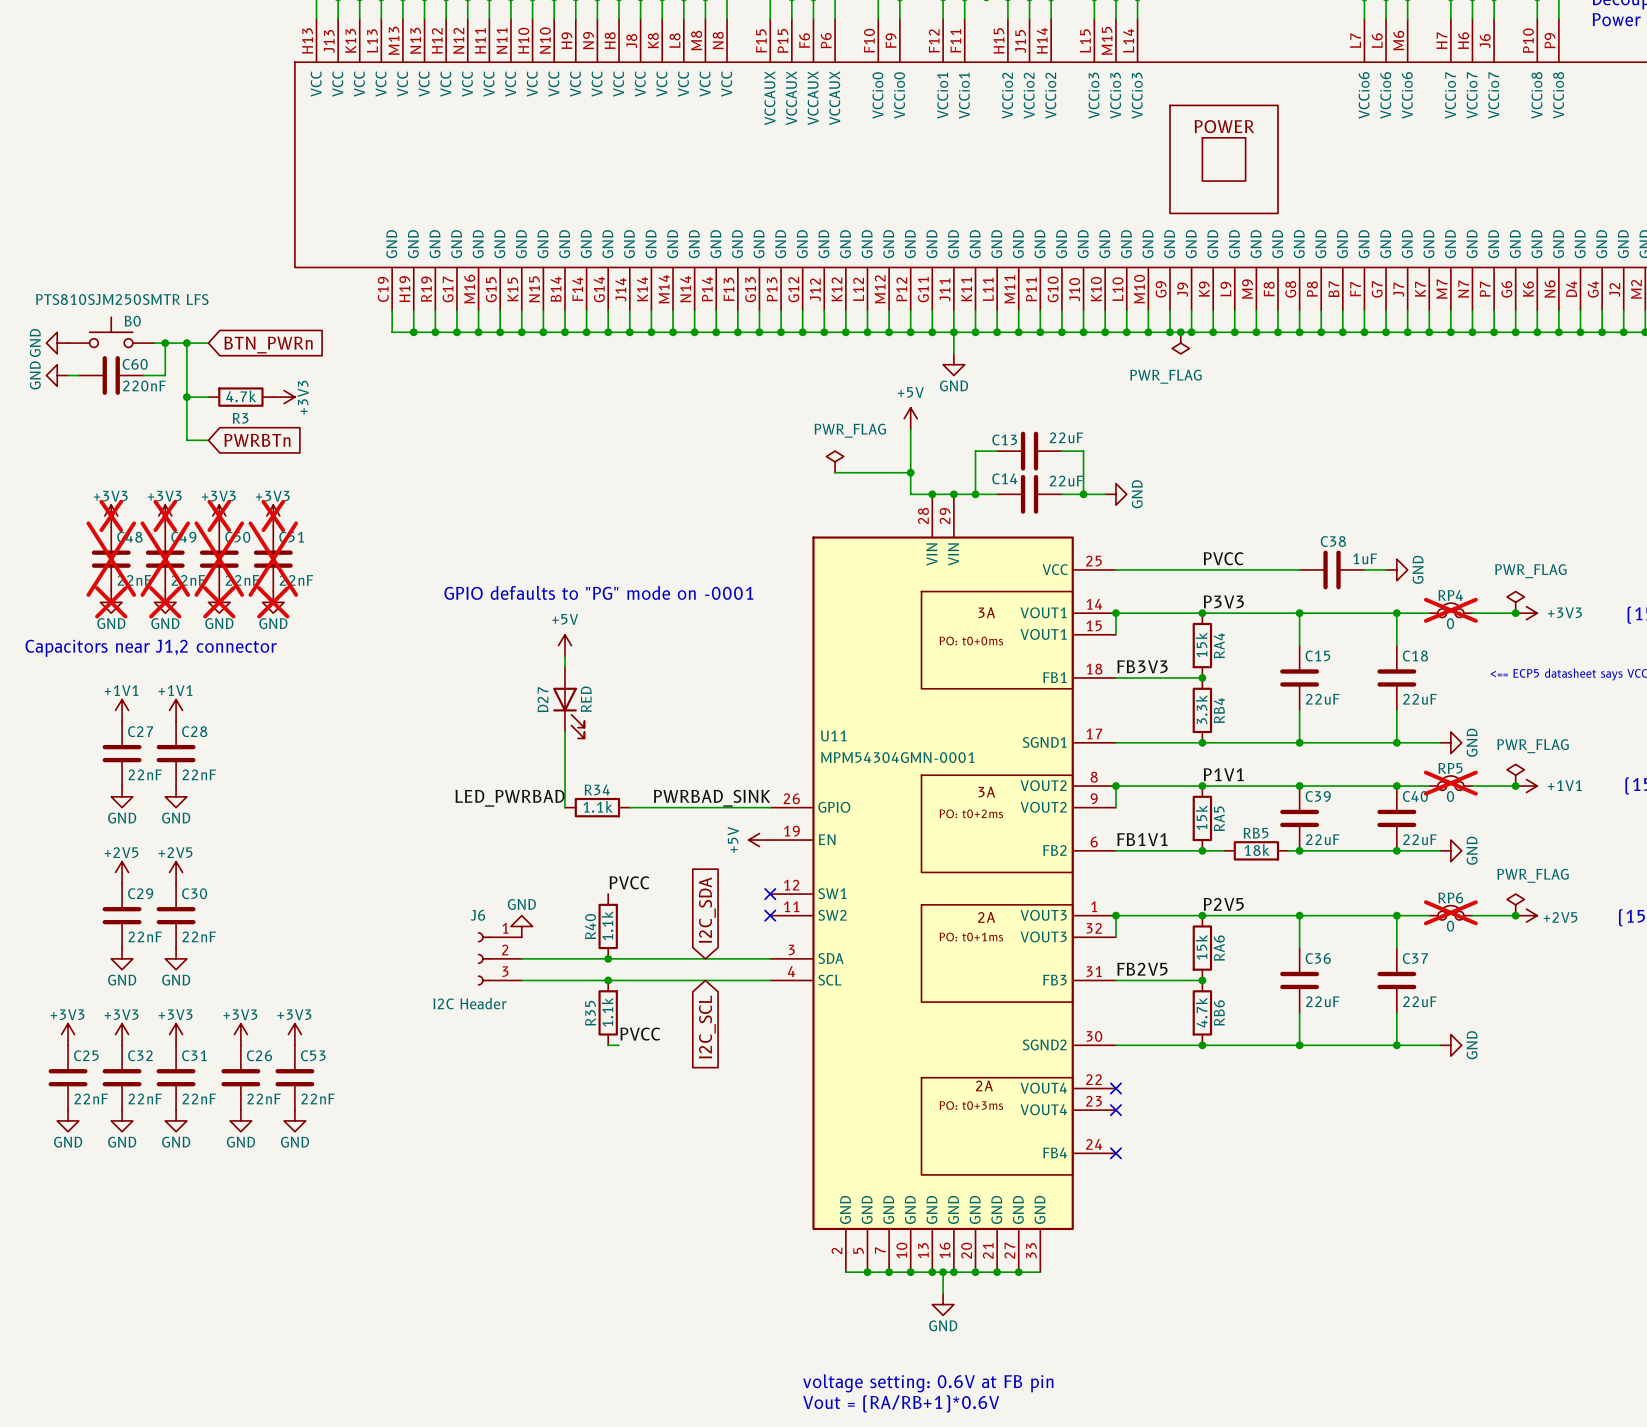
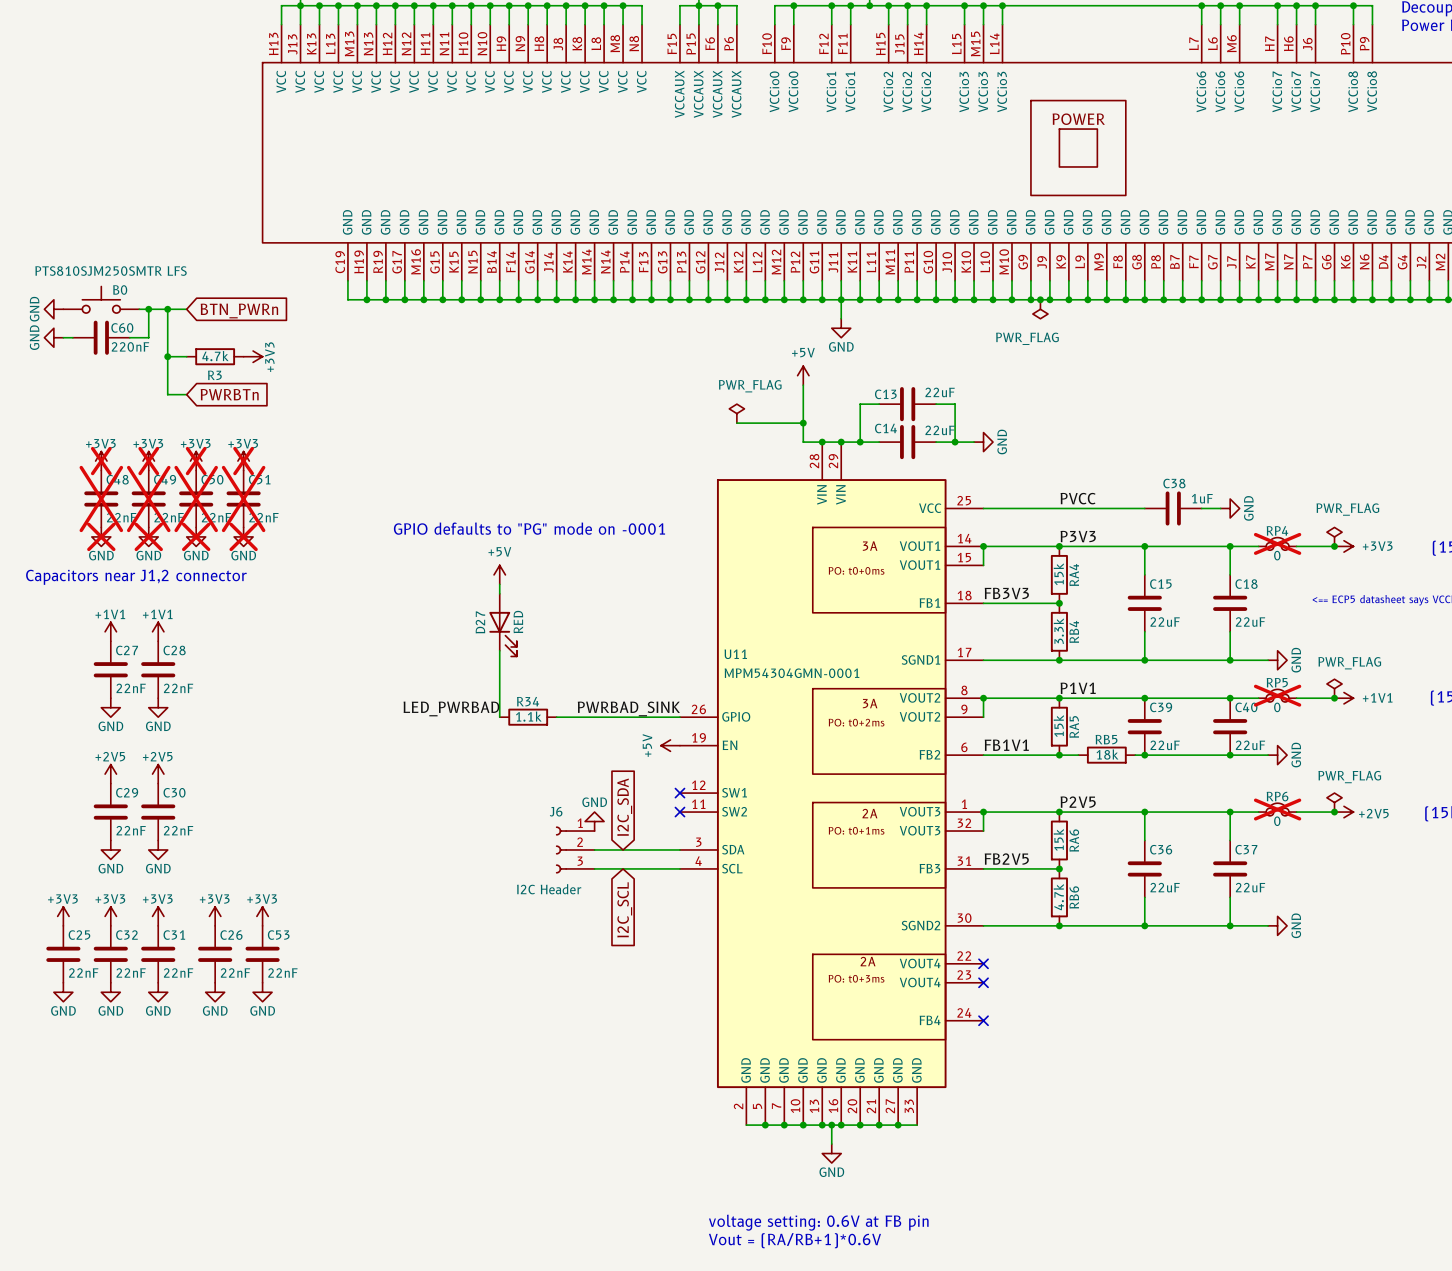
label: PVCC (629, 882) -> none
power symbol position: GND (521, 926) -> GND (594, 821)
R40: 1.1k (608, 926) -> none
J6 position: (499, 958) -> (575, 849)
wire: (521, 958) (673, 958) -> none
junction: (608, 958) -> none
wire: (521, 980) (673, 980) -> none
junction: (608, 980) -> none
R35: 1.1k (608, 1012) -> none
label: PVCC (640, 1034) -> none
wire: (608, 1045) (619, 1045) -> none

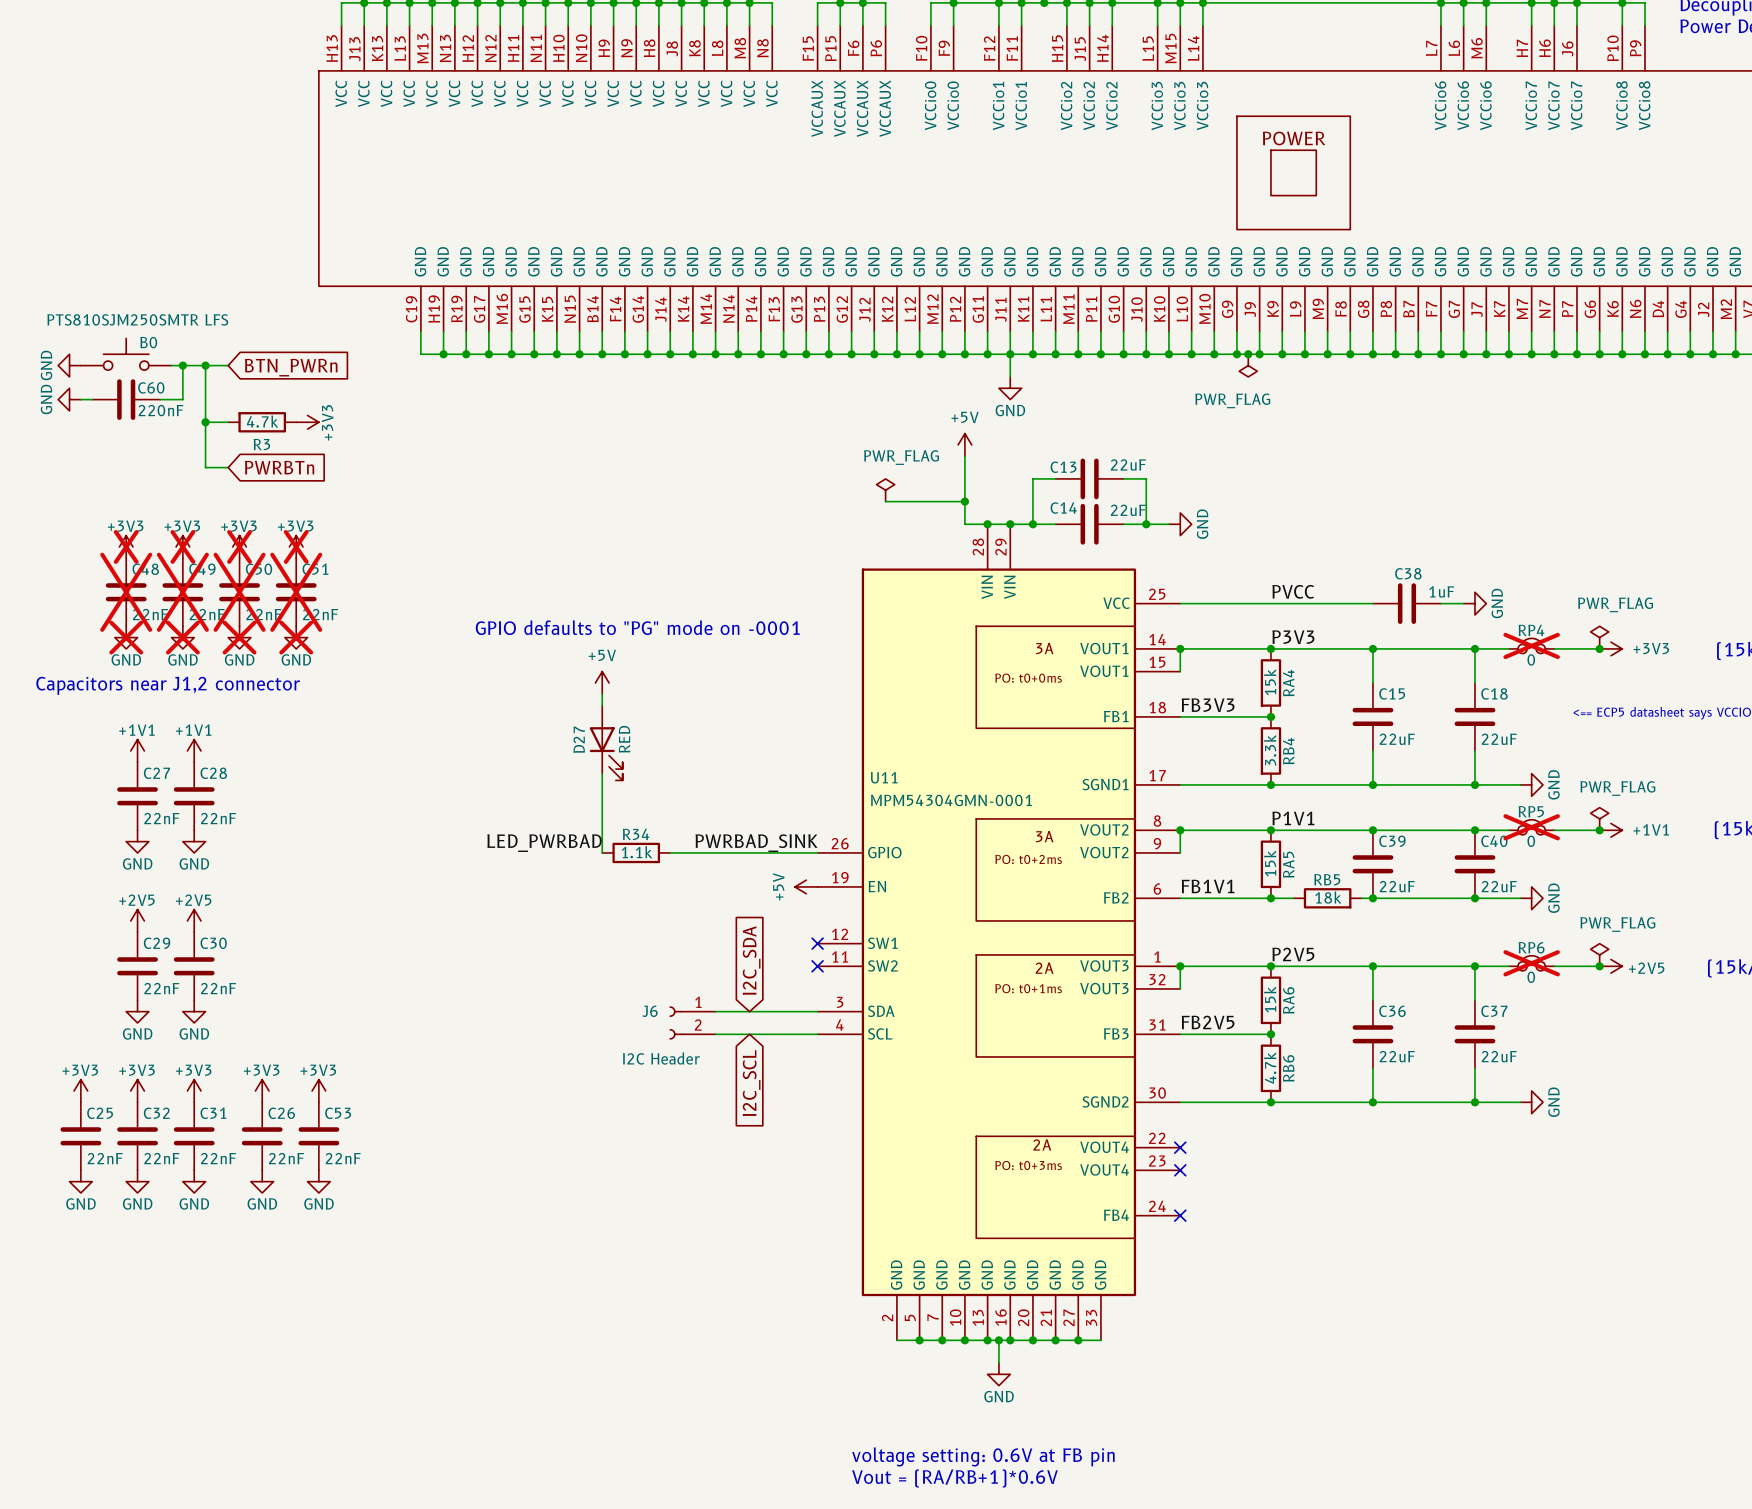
J6 name position: J6 (556, 811) -> J6 (650, 1011)
power symbol: GND (594, 821) -> none
J6 symbol: [556, 826, 595, 874] -> [669, 1006, 716, 1040]

